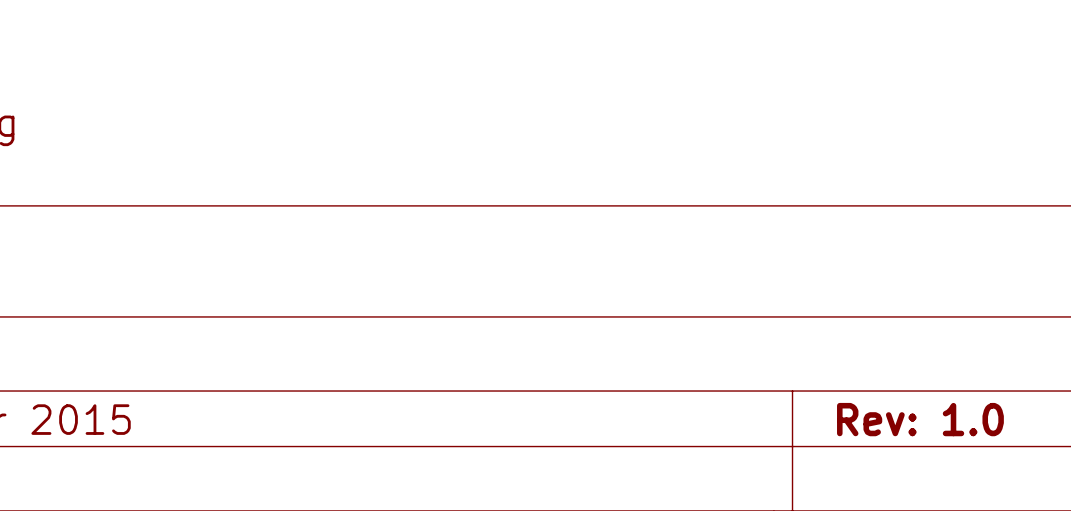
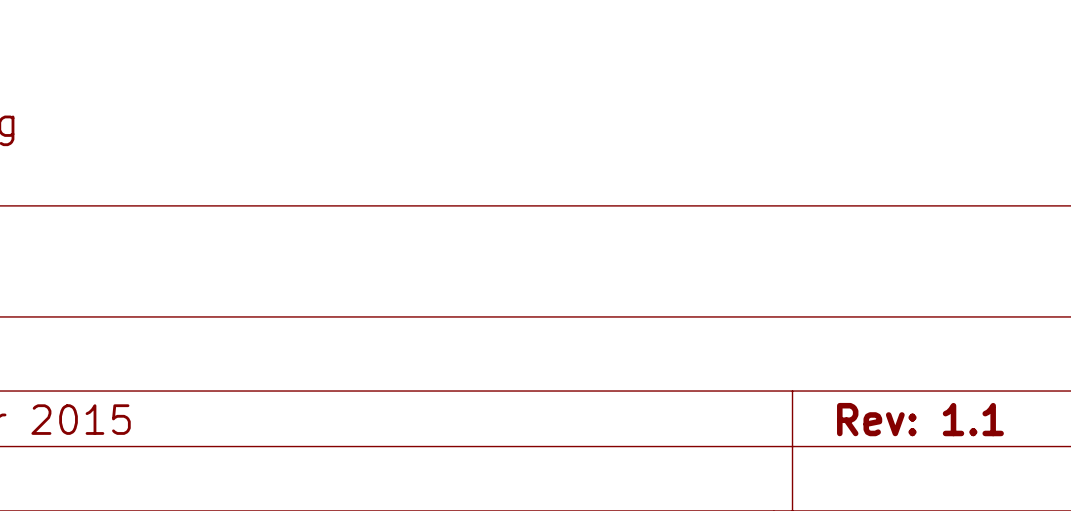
title block: Rev: 1.0 (920, 419) -> Rev: 1.1 (920, 419)

